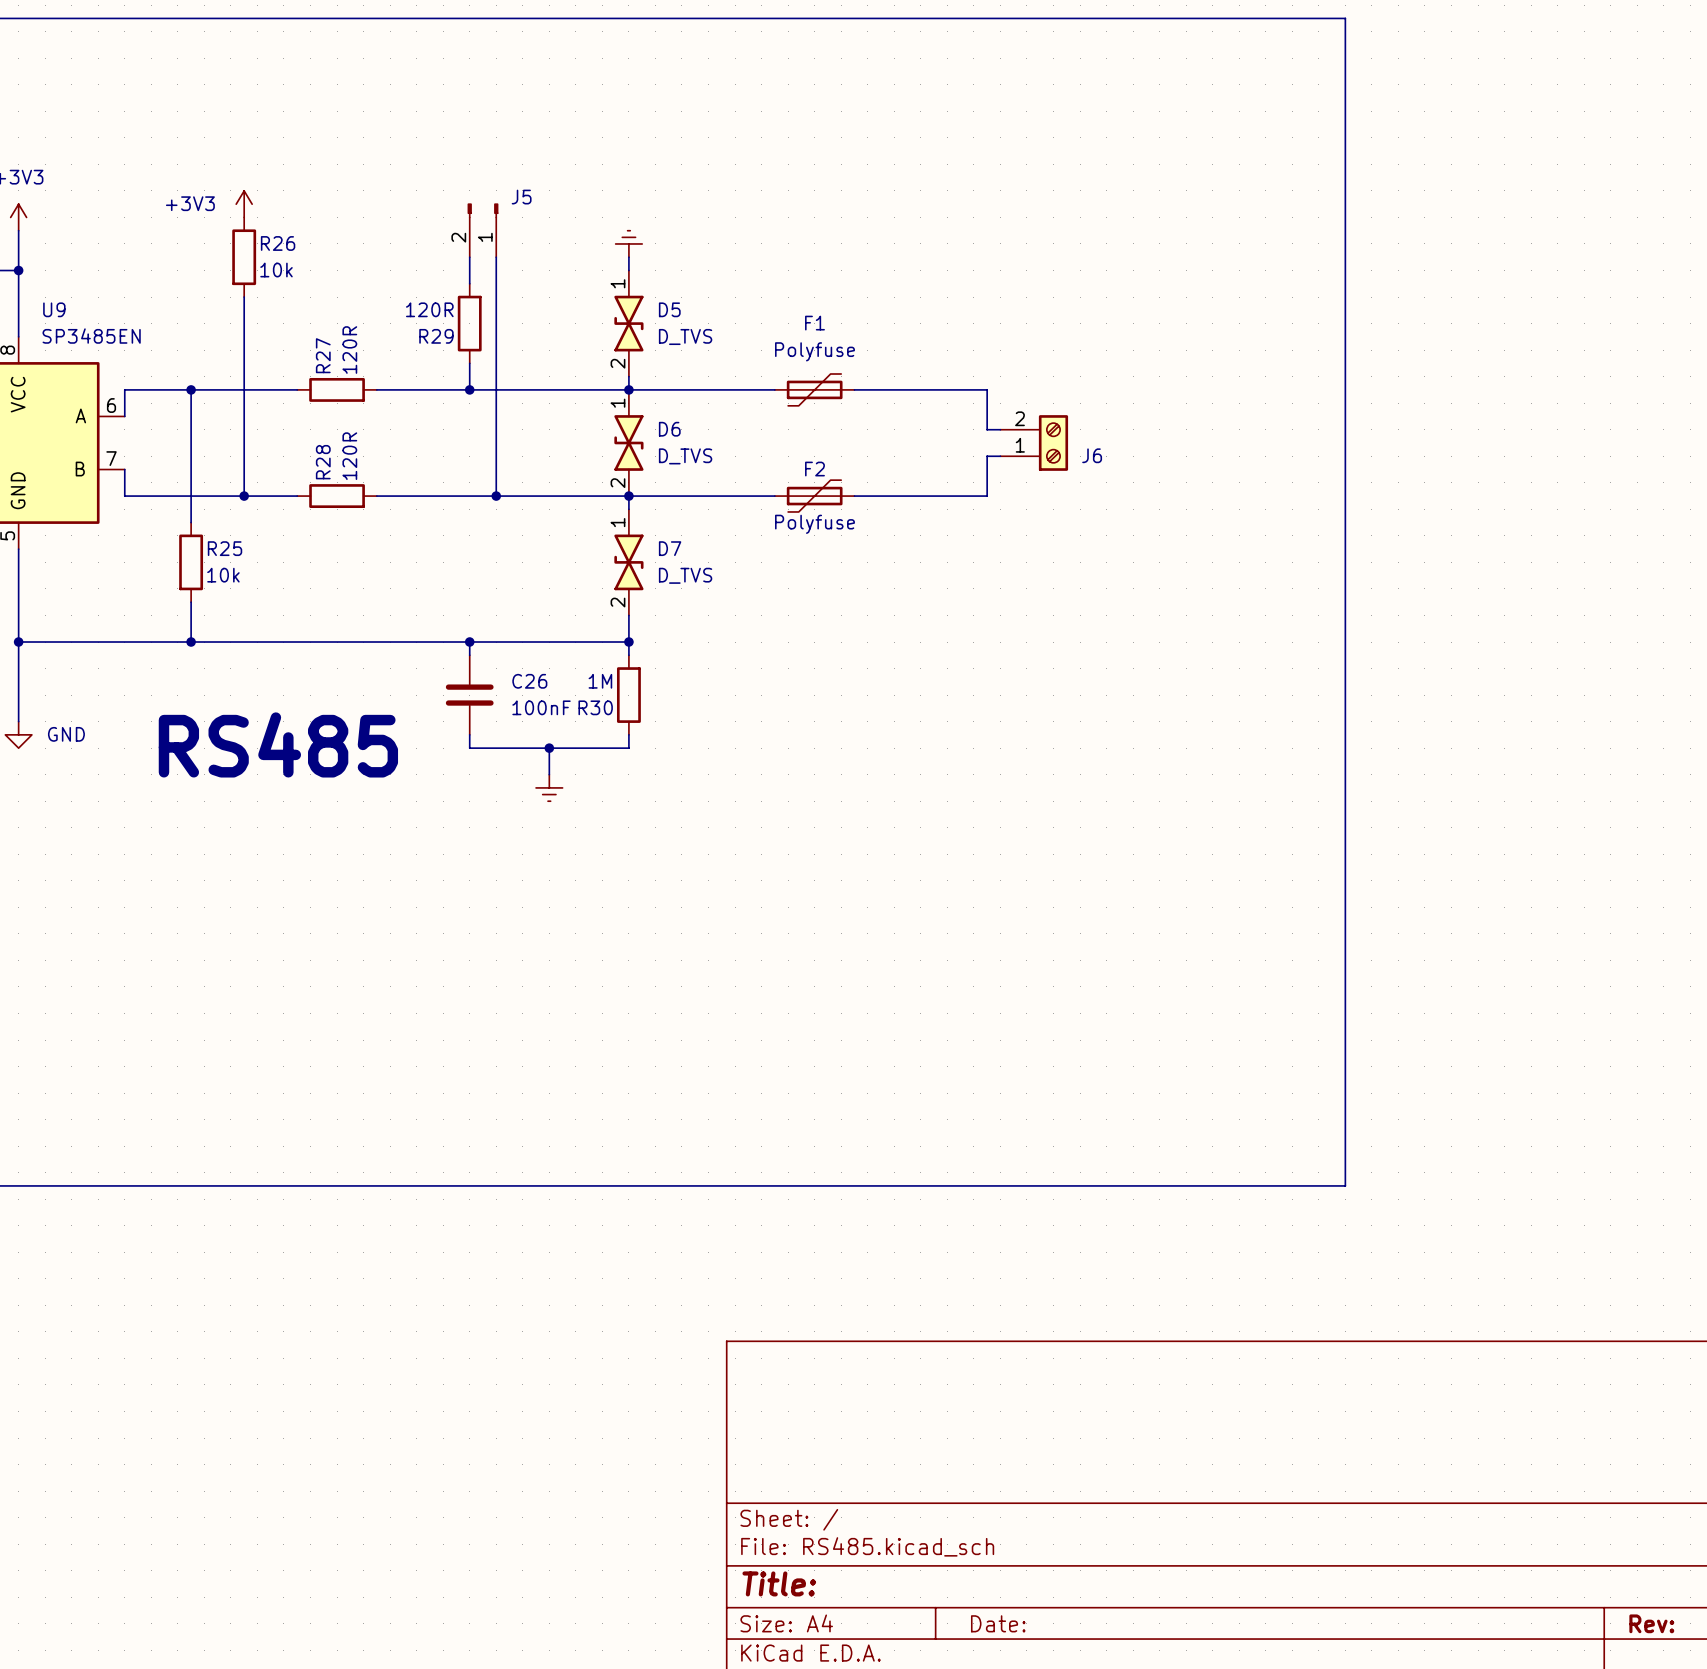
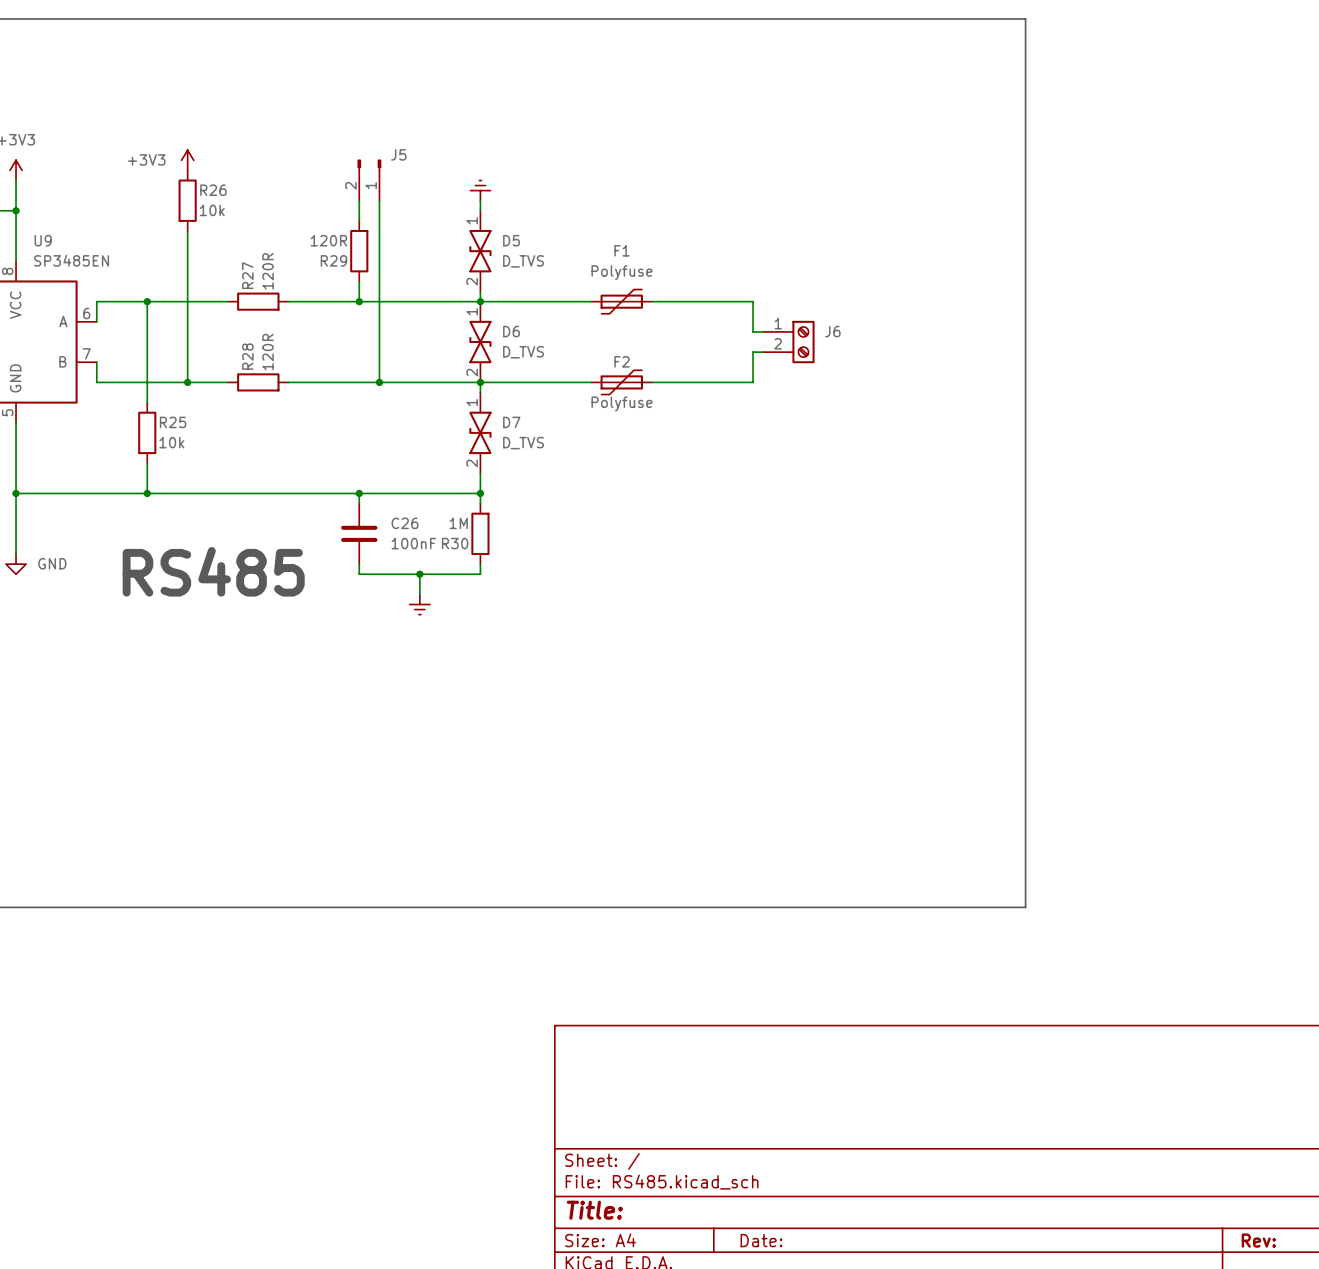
J6 flip: as is (1053, 442) -> up-down (803, 342)

